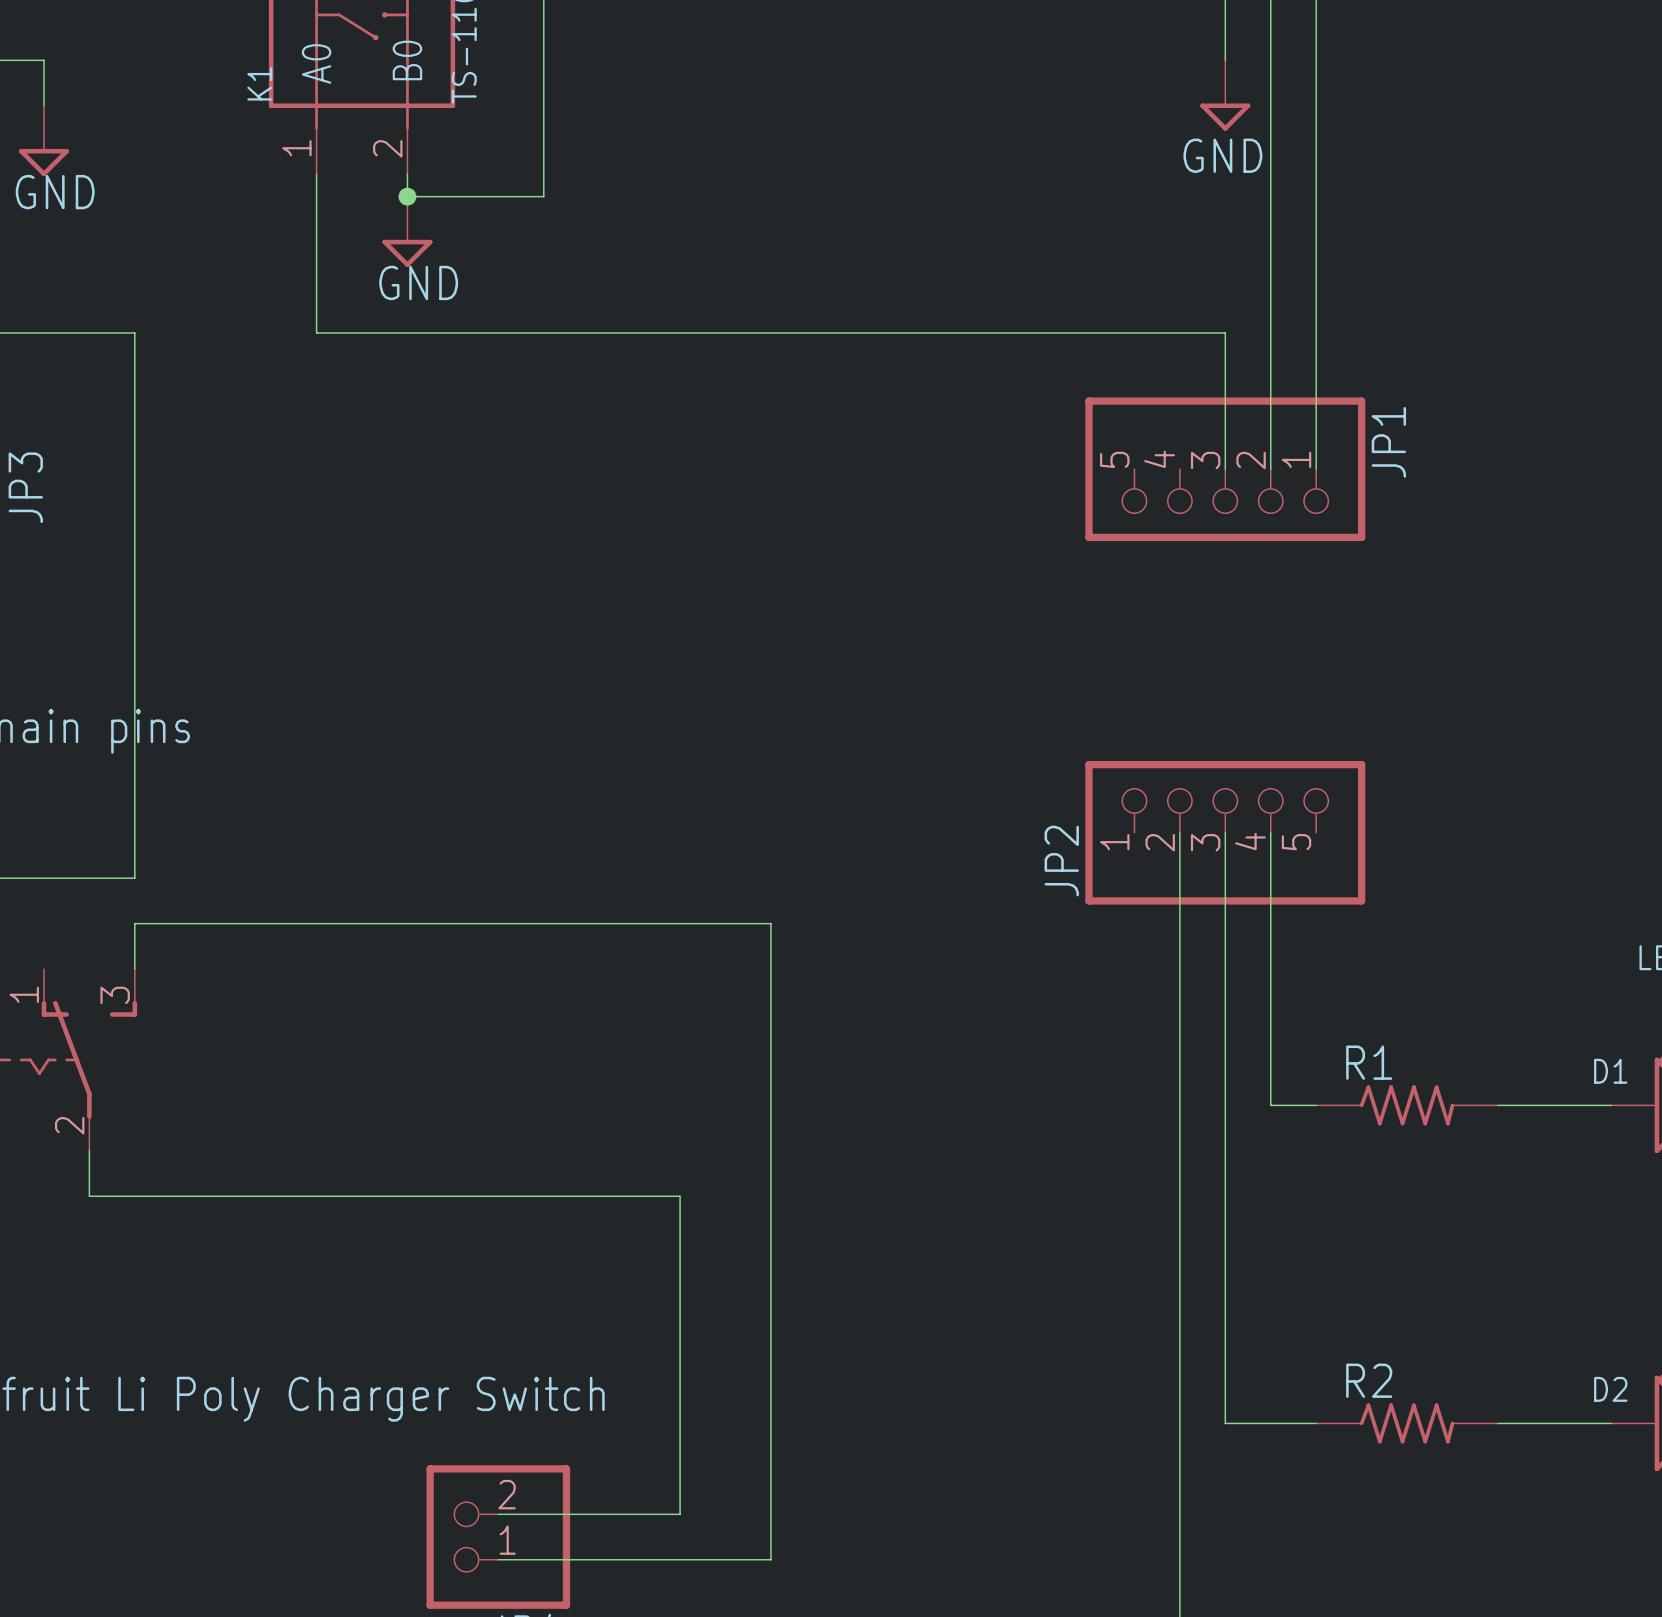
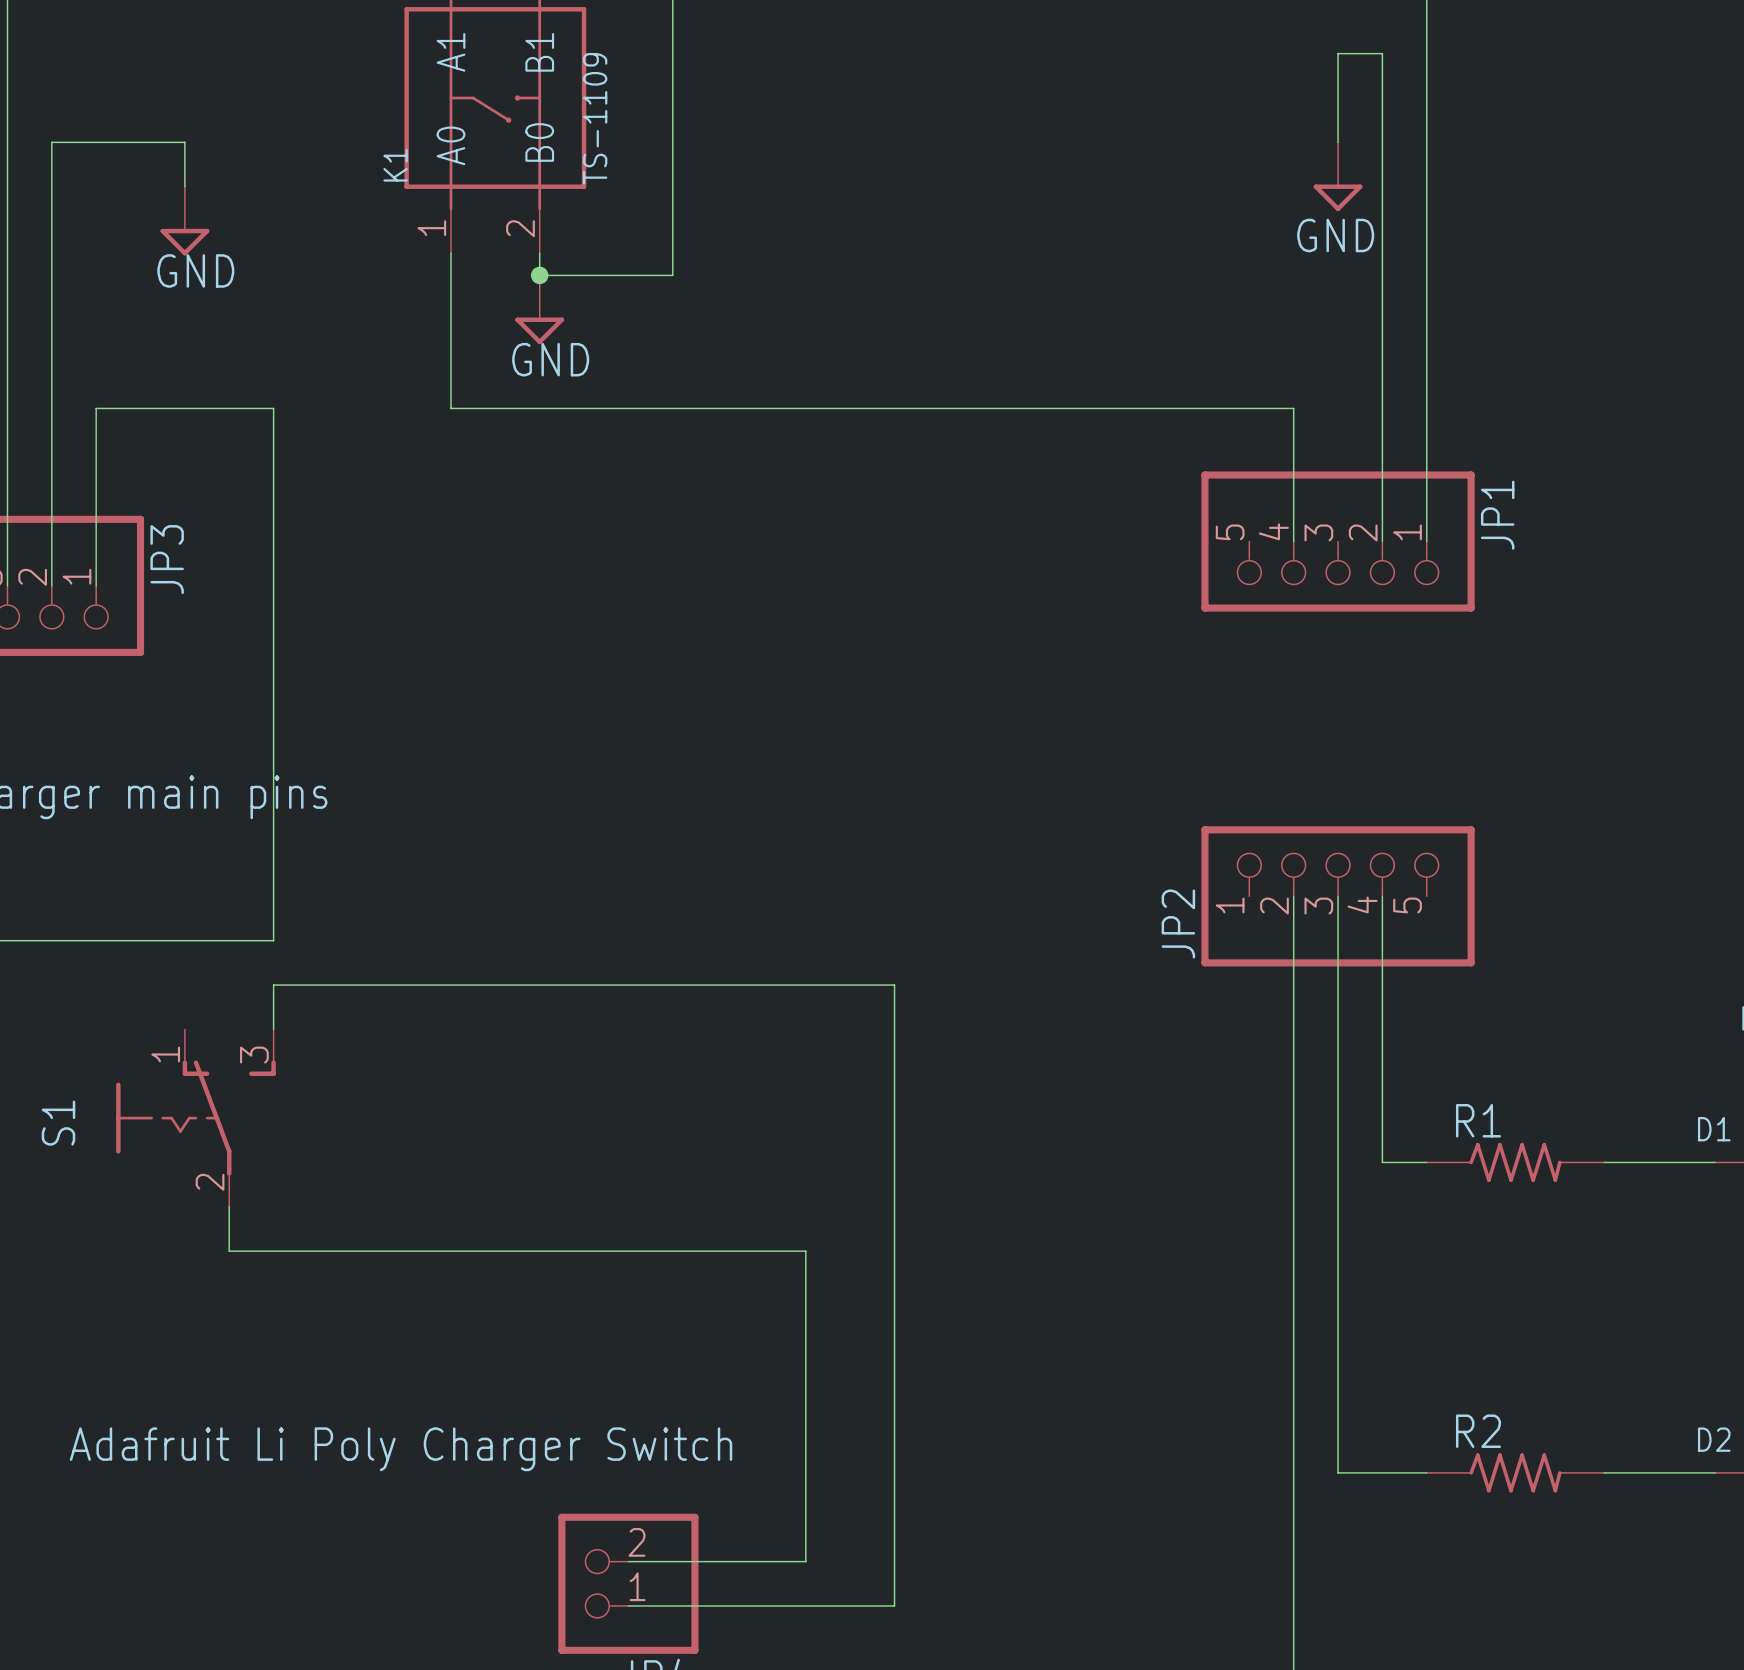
wire: (1179, 332) (1225, 332) (1225, 469) -> (1293, 408) (1293, 541)

